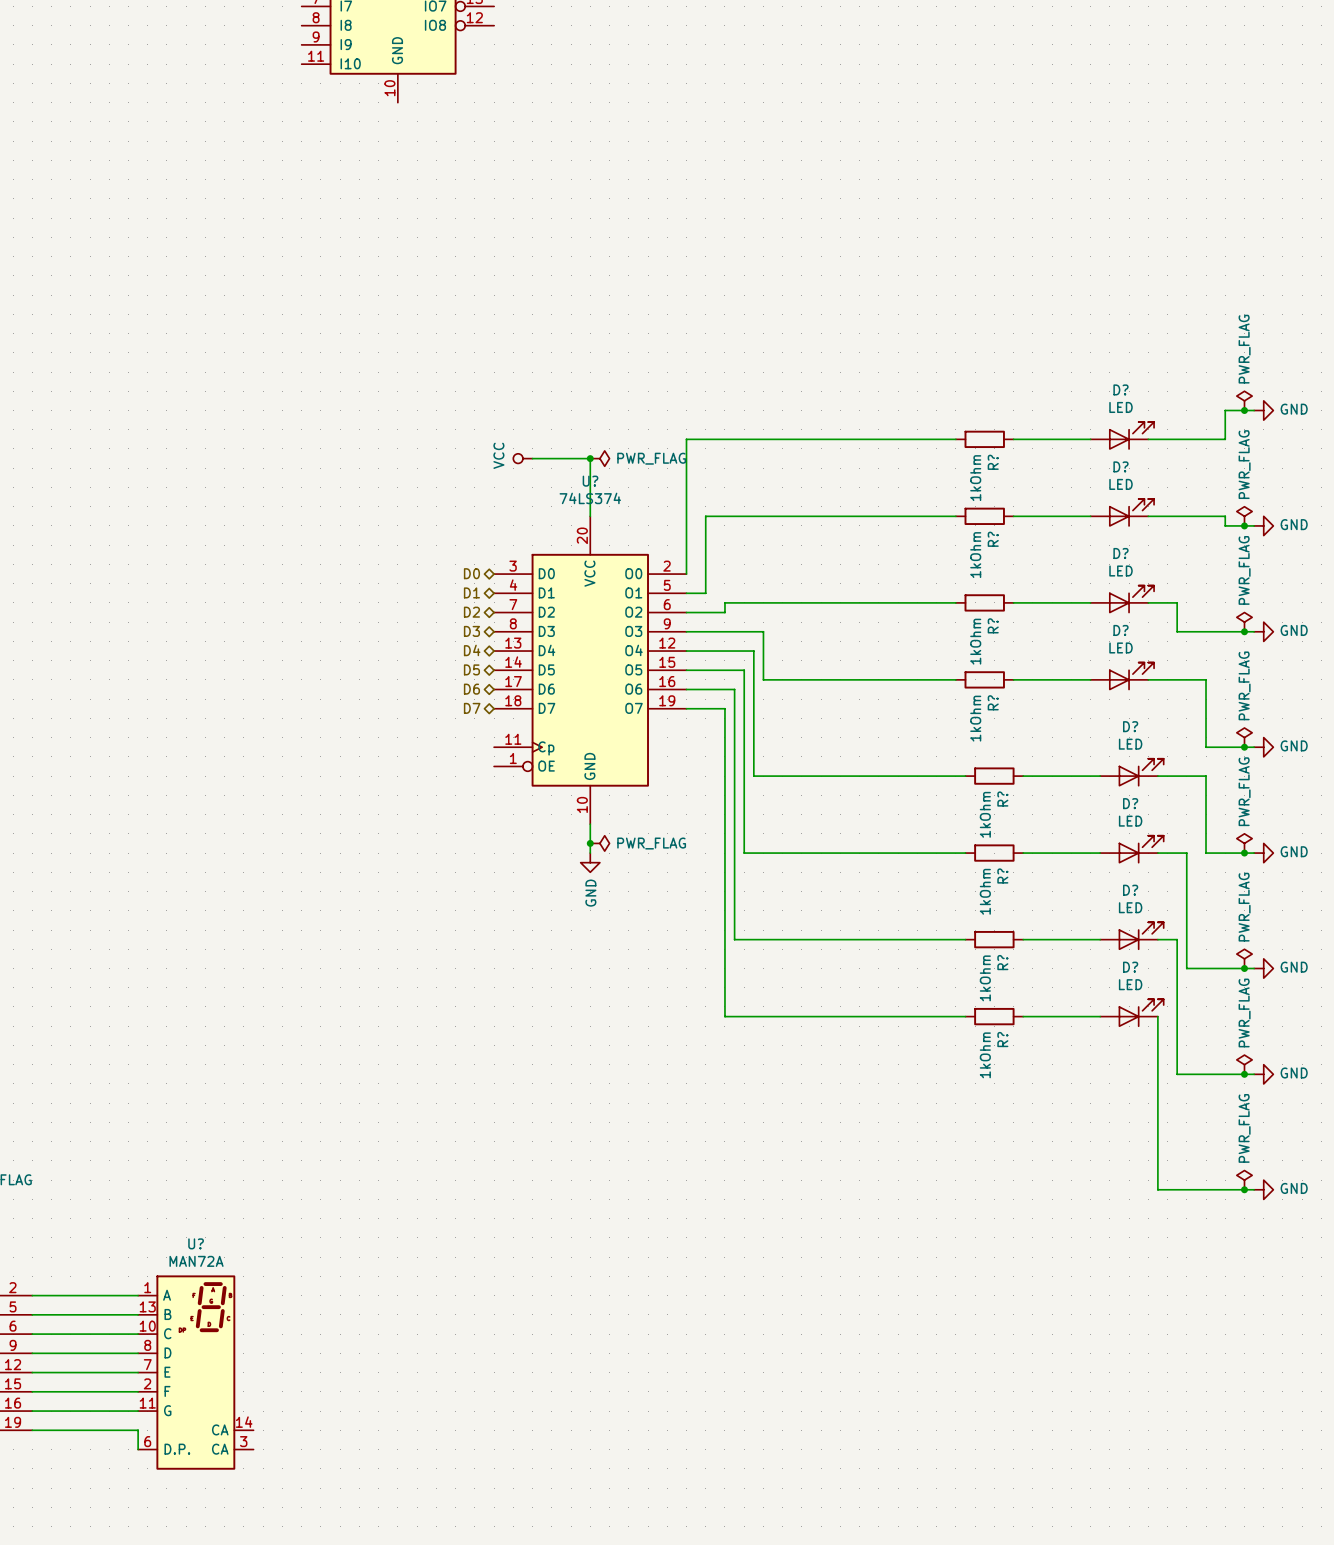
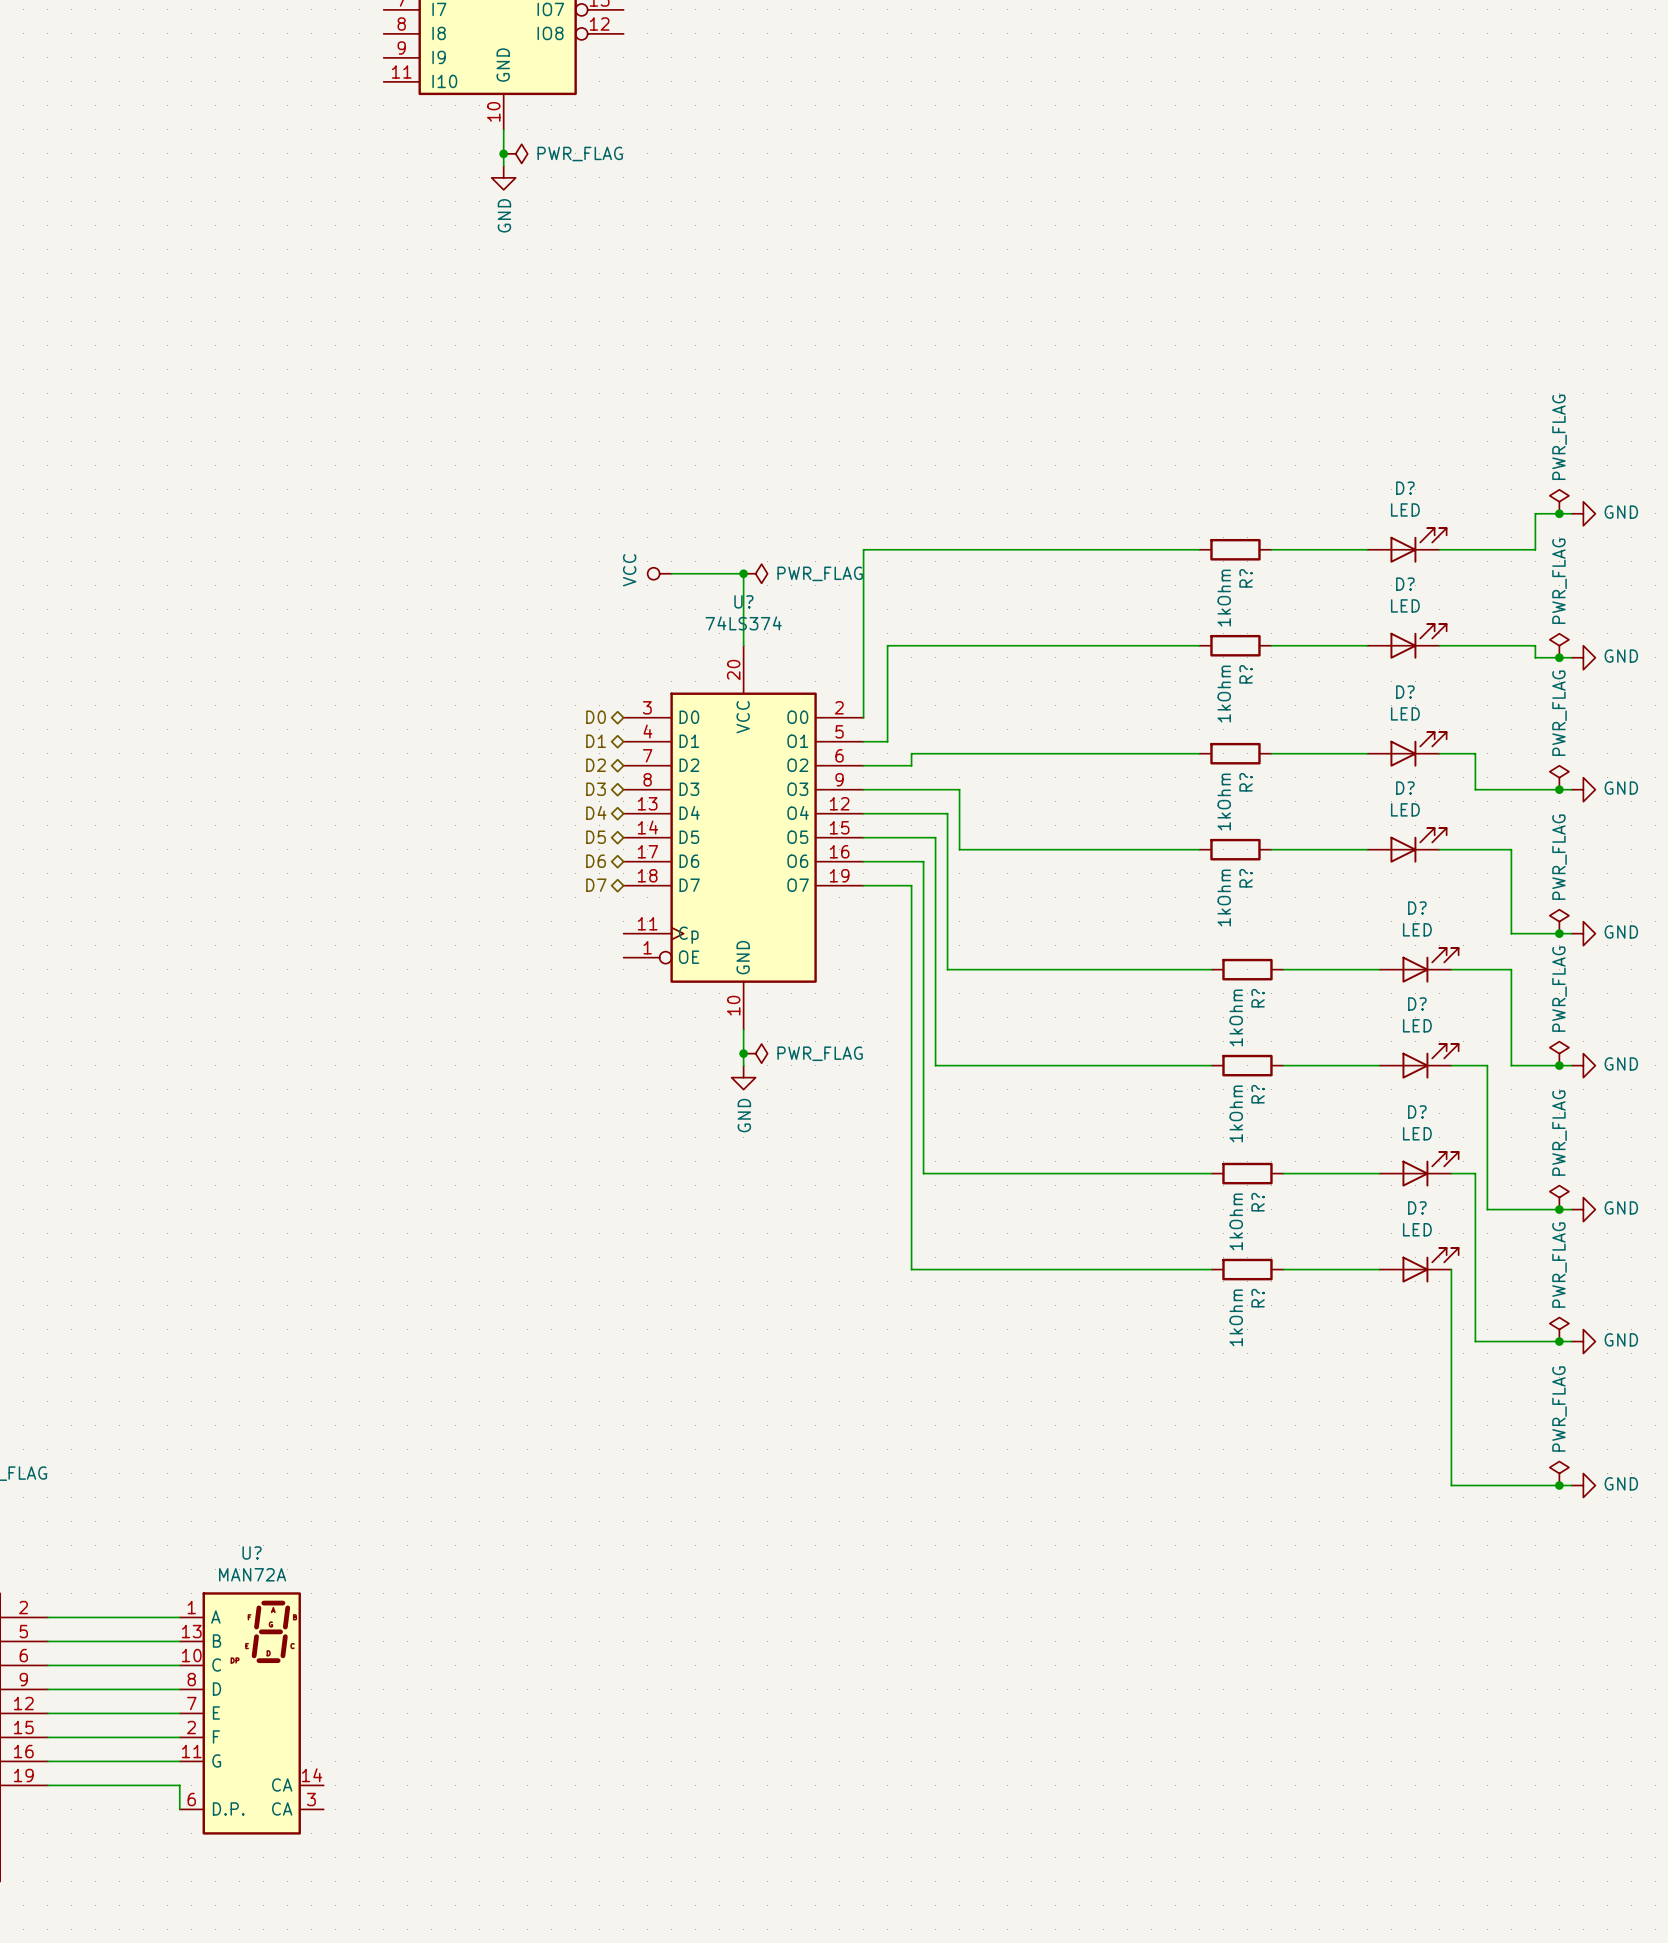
wire: none -> (503, 129) (503, 165)
junction: none -> (503, 153)
power symbol: none -> PWR_FLAG (515, 153)
power symbol: none -> GND (503, 177)

